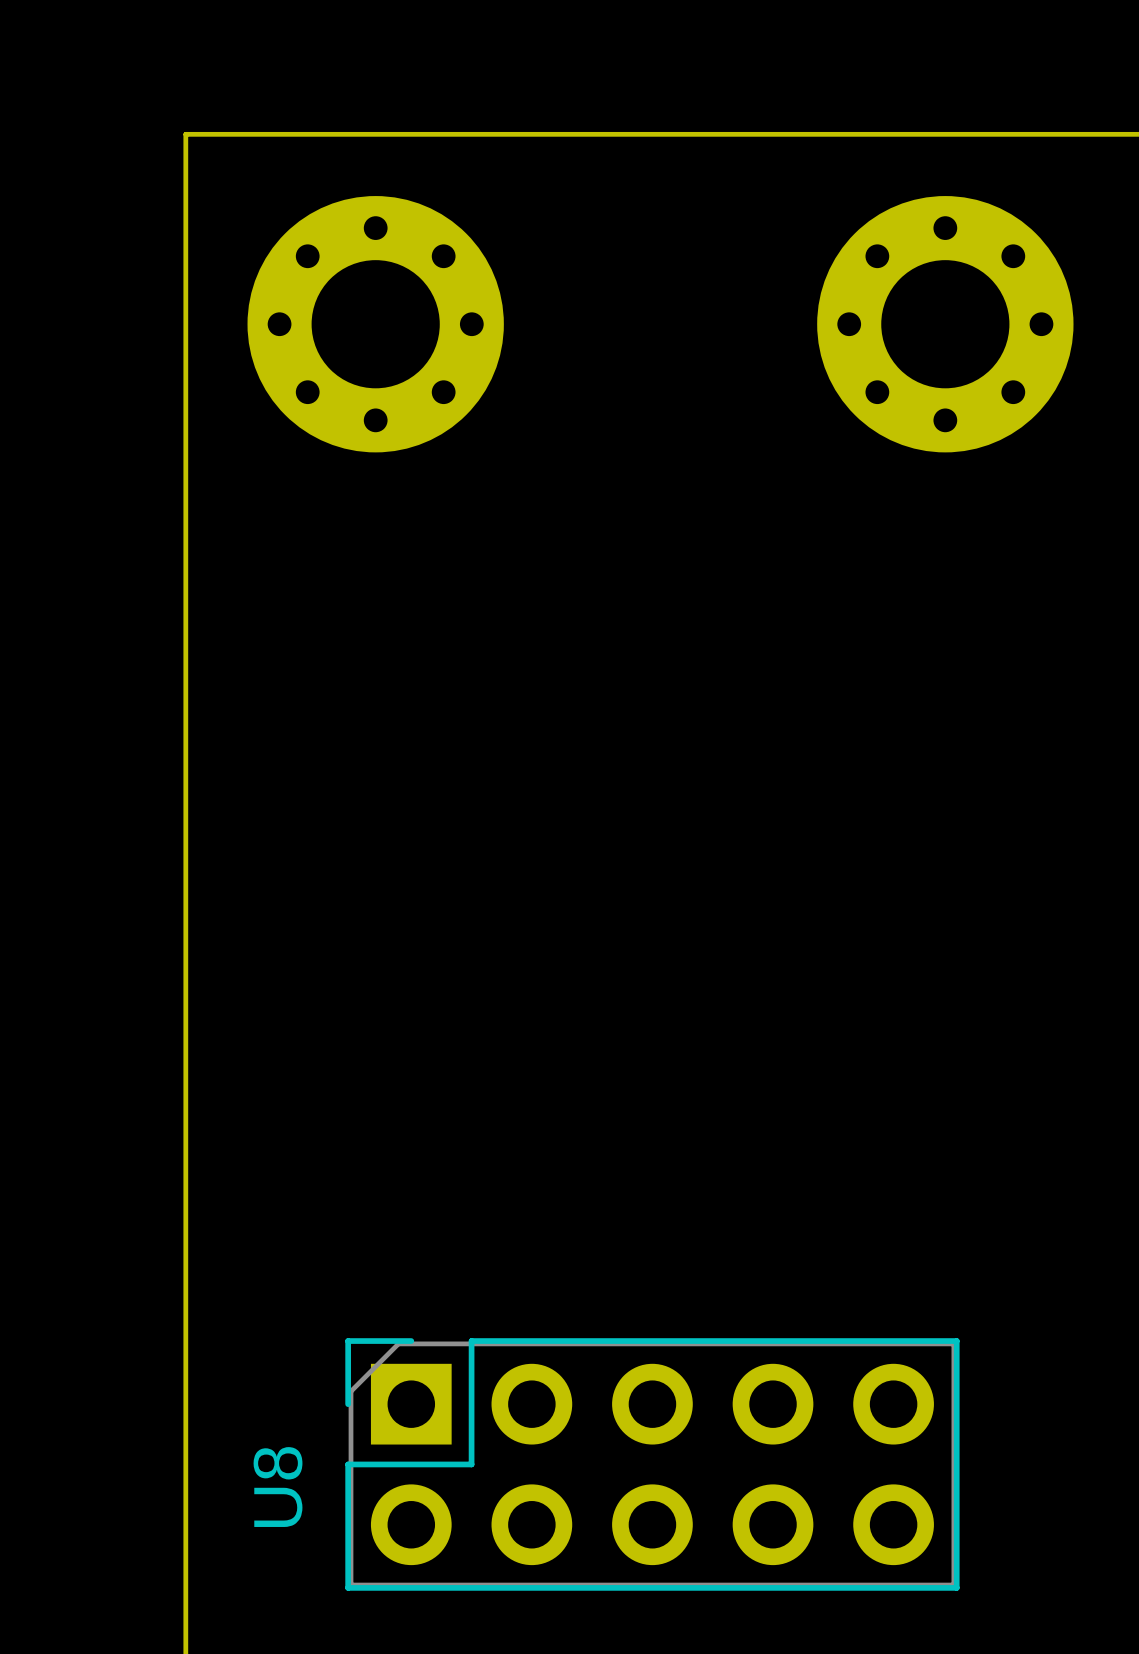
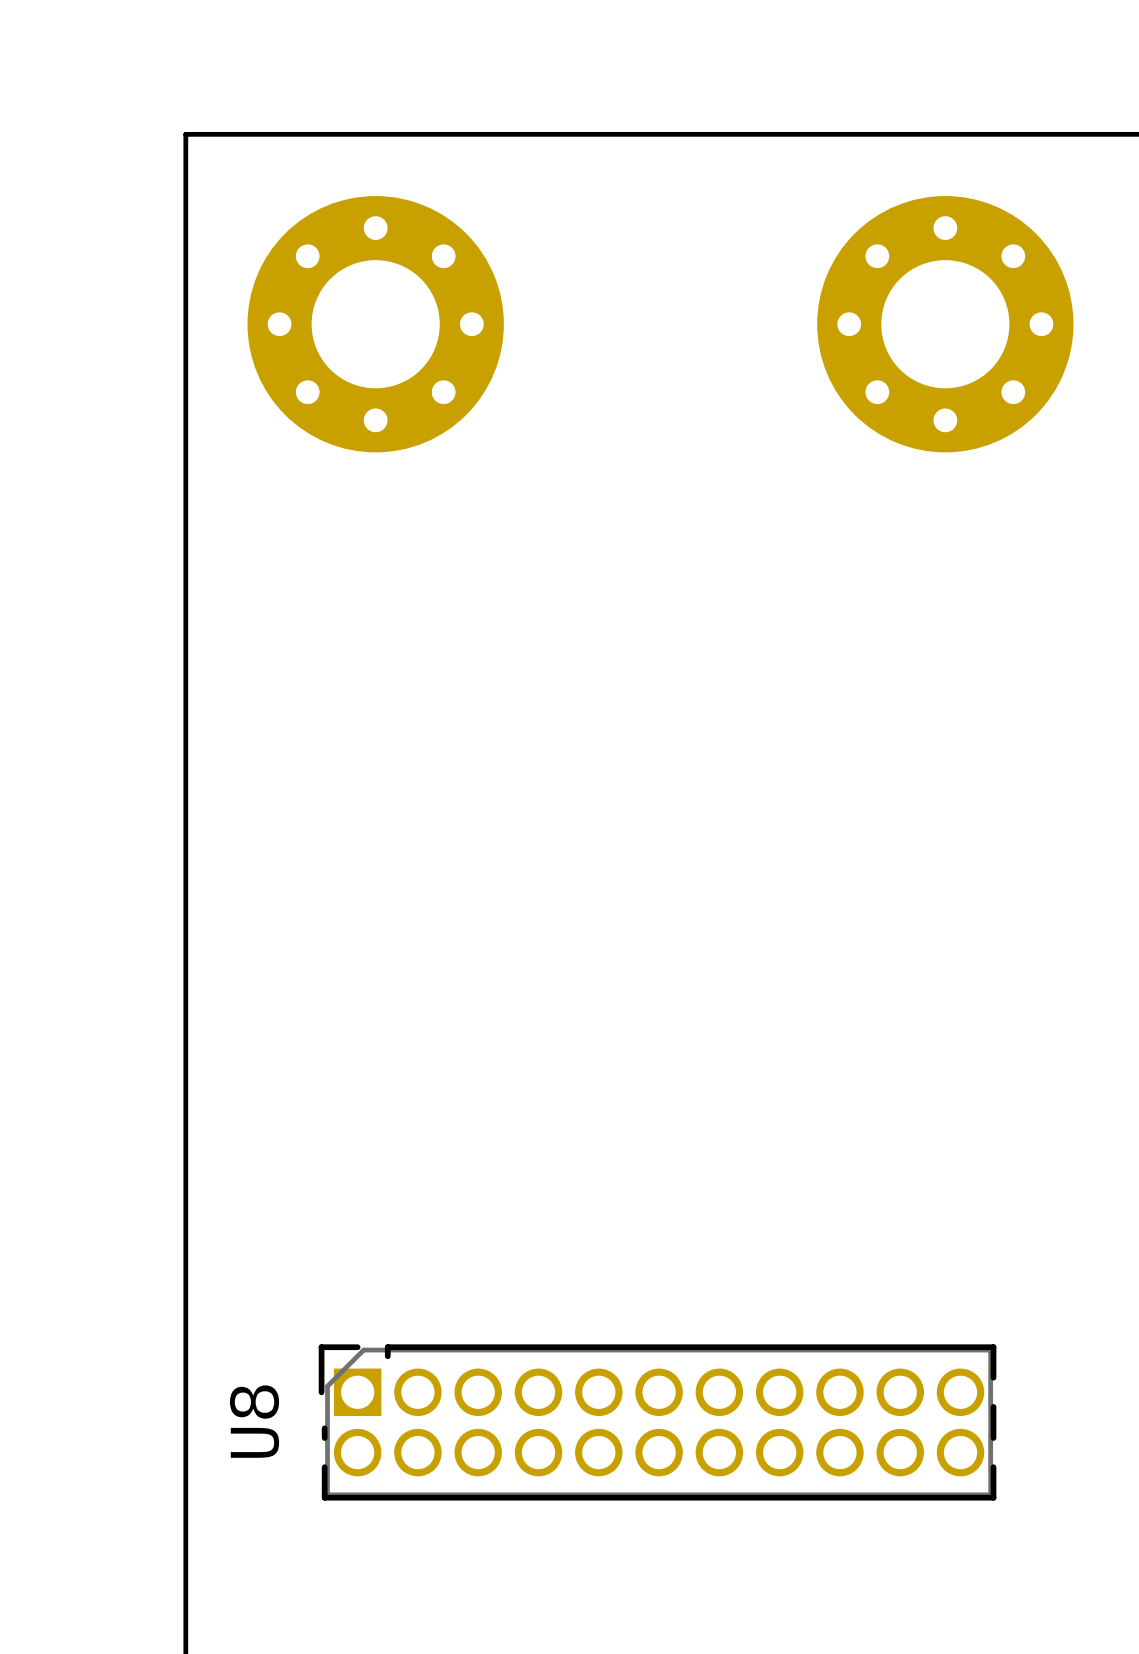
U8 footprint: [247, 196, 1074, 1591] -> [247, 196, 1074, 1501]

